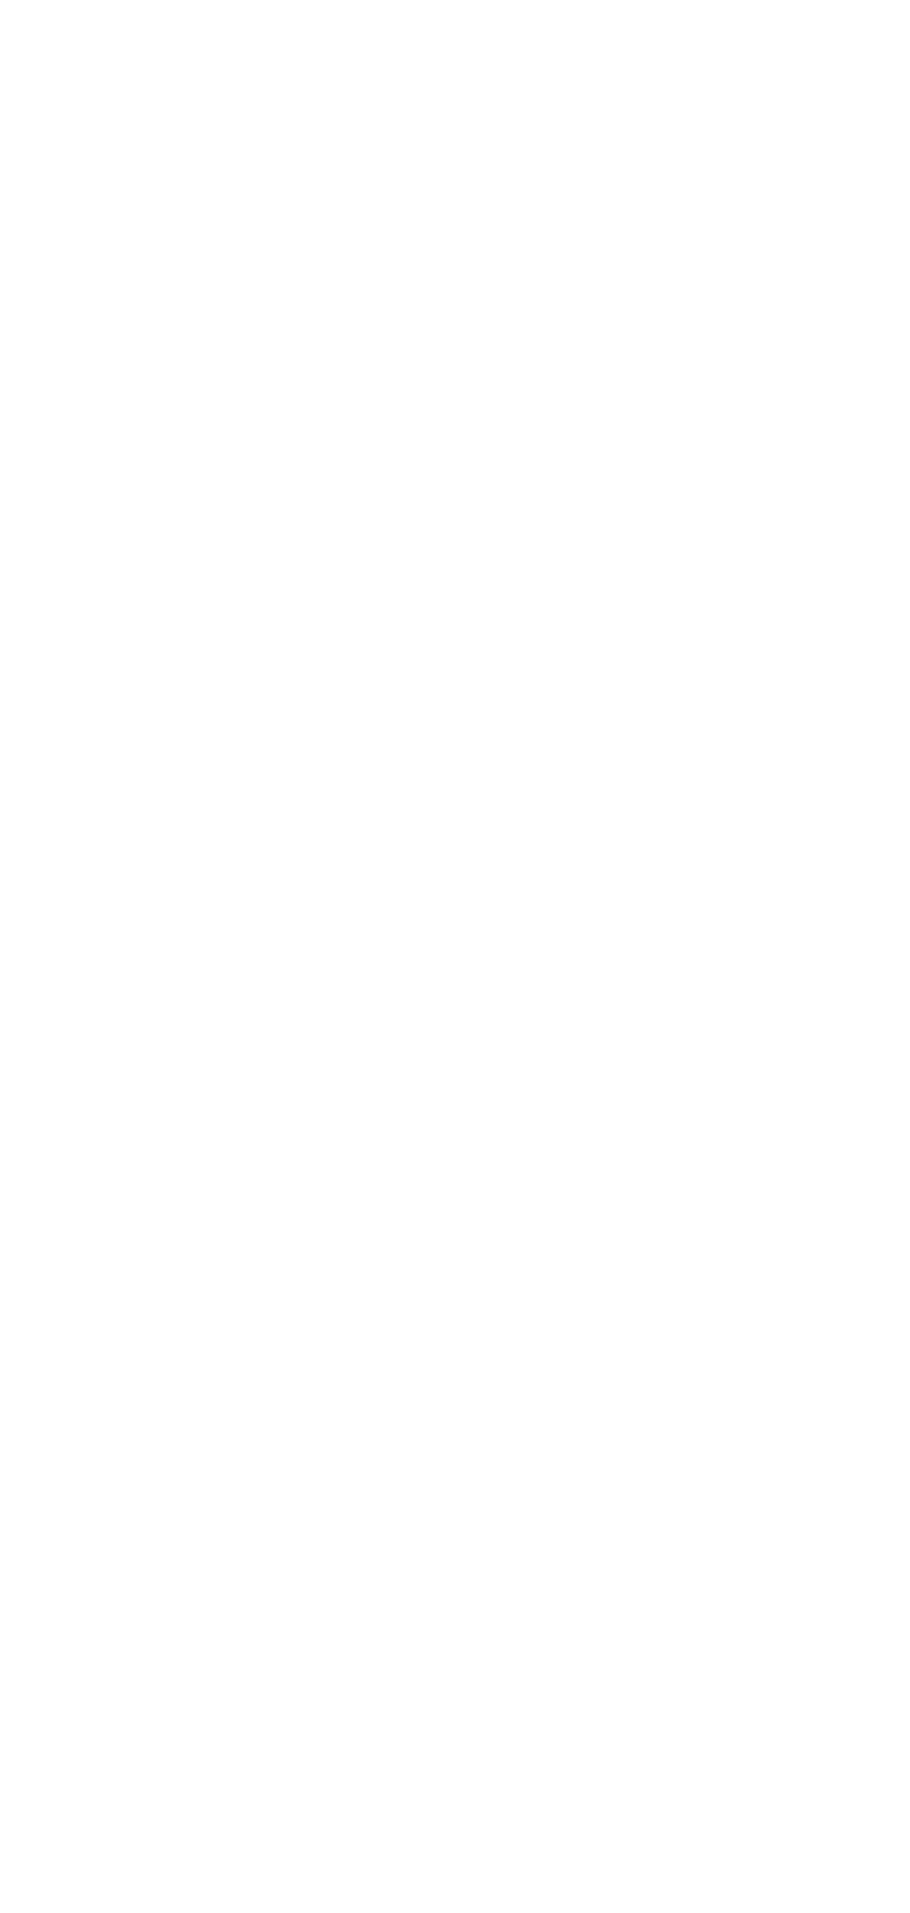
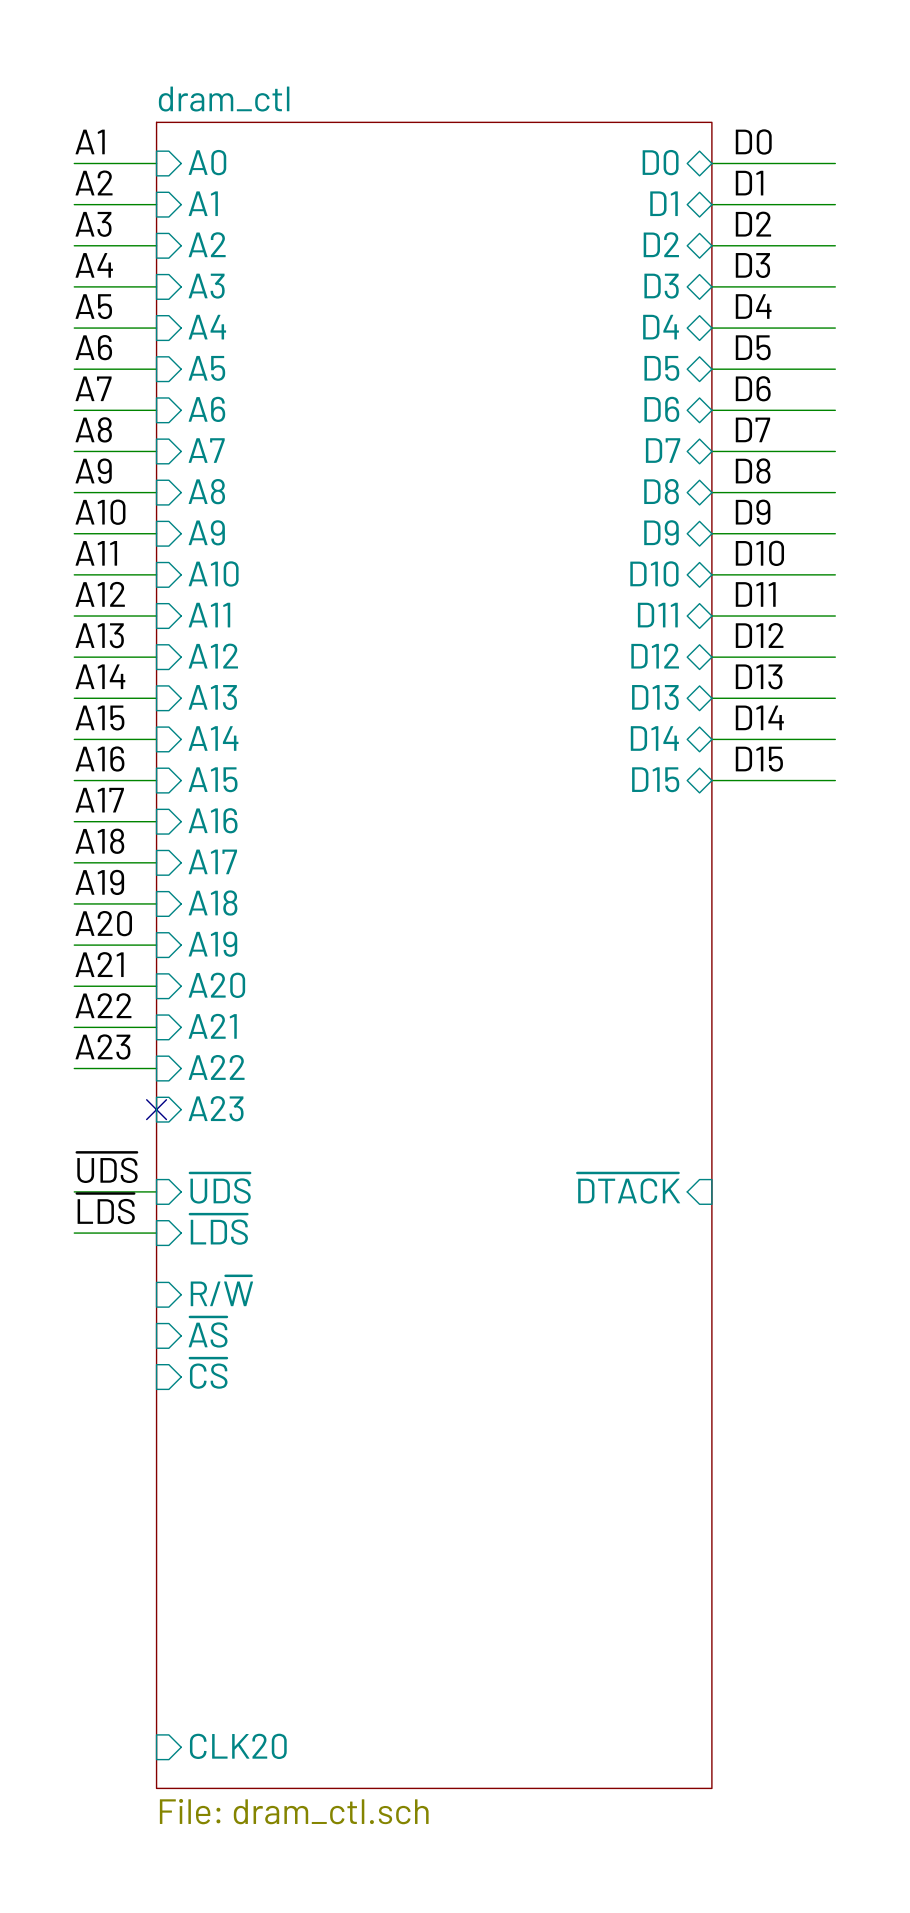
label: none -> A1 (90, 141)
label: none -> D0 (753, 141)
sheet pin: none -> A0 (207, 162)
sheet pin: none -> D0 (660, 162)
wire: none -> (74, 163) (156, 163)
wire: none -> (711, 163) (835, 163)
label: none -> A2 (93, 182)
label: none -> D1 (749, 183)
sheet pin: none -> A1 (203, 203)
sheet pin: none -> D1 (664, 203)
wire: none -> (74, 204) (156, 204)
wire: none -> (711, 204) (835, 204)
label: none -> A3 (93, 224)
label: none -> D2 (753, 224)
sheet pin: none -> A2 (207, 244)
sheet pin: none -> D2 (661, 244)
wire: none -> (74, 245) (156, 245)
wire: none -> (711, 245) (835, 245)
label: none -> A4 (94, 265)
label: none -> D3 (752, 265)
wire: none -> (74, 286) (156, 286)
sheet pin: none -> A3 (206, 286)
sheet pin: none -> D3 (661, 286)
wire: none -> (711, 286) (835, 286)
label: none -> A5 (93, 306)
label: none -> D4 (753, 306)
sheet pin: none -> A4 (207, 327)
sheet pin: none -> D4 (661, 327)
wire: none -> (74, 328) (156, 328)
wire: none -> (711, 328) (835, 328)
label: none -> A6 (93, 347)
label: none -> D5 (753, 347)
sheet pin: none -> A5 (206, 368)
sheet pin: none -> D5 (661, 368)
wire: none -> (74, 369) (156, 369)
wire: none -> (711, 369) (835, 369)
label: none -> A7 (93, 388)
label: none -> D6 (753, 388)
sheet pin: none -> A6 (206, 409)
sheet pin: none -> D6 (661, 409)
wire: none -> (74, 410) (156, 410)
wire: none -> (711, 410) (835, 410)
label: none -> A8 (93, 429)
label: none -> D7 (752, 429)
sheet pin: none -> A7 (206, 450)
sheet pin: none -> D7 (663, 450)
wire: none -> (74, 451) (156, 451)
wire: none -> (711, 451) (835, 451)
label: none -> A9 (93, 471)
label: none -> D8 (753, 471)
sheet pin: none -> A8 (206, 491)
sheet pin: none -> D8 (661, 491)
wire: none -> (74, 492) (156, 492)
wire: none -> (711, 492) (835, 492)
label: none -> A10 (100, 512)
label: none -> D9 (753, 512)
sheet pin: none -> A9 (206, 532)
sheet pin: none -> D9 (661, 532)
wire: none -> (74, 533) (156, 533)
wire: none -> (711, 533) (835, 533)
label: none -> A11 (96, 553)
label: none -> D10 (759, 553)
sheet pin: none -> A10 (213, 573)
sheet pin: none -> D10 (654, 573)
wire: none -> (74, 574) (156, 574)
wire: none -> (711, 574) (835, 574)
label: none -> A12 (100, 594)
label: none -> D11 (755, 594)
sheet pin: none -> A11 (209, 615)
sheet pin: none -> D11 (657, 615)
wire: none -> (74, 616) (156, 616)
wire: none -> (711, 616) (835, 616)
label: none -> A13 (99, 635)
label: none -> D12 (759, 635)
sheet pin: none -> A12 (213, 656)
sheet pin: none -> D12 (655, 656)
wire: none -> (74, 657) (156, 657)
wire: none -> (711, 657) (835, 657)
label: none -> A14 (100, 676)
label: none -> D13 (759, 676)
sheet pin: none -> A13 (212, 697)
sheet pin: none -> D13 (655, 697)
wire: none -> (74, 698) (156, 698)
wire: none -> (711, 698) (835, 698)
label: none -> D14 (759, 717)
label: none -> A15 (99, 718)
sheet pin: none -> A14 (213, 738)
sheet pin: none -> D14 (654, 738)
wire: none -> (74, 739) (156, 739)
wire: none -> (711, 739) (835, 739)
label: none -> A16 (99, 759)
label: none -> D15 (759, 759)
sheet pin: none -> A15 (213, 779)
sheet pin: none -> D15 (655, 779)
wire: none -> (74, 780) (156, 780)
wire: none -> (711, 780) (835, 780)
label: none -> A17 (99, 800)
sheet pin: none -> A16 (213, 820)
wire: none -> (74, 821) (156, 821)
label: none -> A18 (99, 841)
sheet pin: none -> A17 (212, 861)
wire: none -> (74, 862) (156, 862)
label: none -> A19 (99, 882)
wire: none -> (74, 903) (156, 903)
sheet pin: none -> A18 (212, 903)
label: none -> A20 (103, 923)
sheet pin: none -> A19 (212, 944)
wire: none -> (74, 945) (156, 945)
sheet dram_ctl: none -> File: dram_ctl.sch (434, 955)
label: none -> A21 (99, 964)
sheet pin: none -> A20 (216, 985)
wire: none -> (74, 986) (156, 986)
label: none -> A22 (103, 1005)
sheet pin: none -> A21 (212, 1026)
wire: none -> (74, 1027) (156, 1027)
label: none -> A23 (102, 1046)
sheet pin: none -> A22 (216, 1067)
wire: none -> (74, 1068) (156, 1068)
sheet pin: none -> A23 (216, 1108)
no-connect mark: none -> (156, 1109)
label: none -> ~{UDS} (107, 1167)
sheet pin: none -> ~{UDS} (220, 1188)
sheet pin: none -> ~{DTACK} (628, 1188)
wire: none -> (74, 1191) (156, 1191)
label: none -> ~{LDS} (105, 1208)
sheet pin: none -> ~{LDS} (218, 1229)
wire: none -> (74, 1233) (156, 1233)
sheet pin: none -> R/~{W} (221, 1291)
sheet pin: none -> ~{AS} (208, 1332)
sheet pin: none -> ~{CS} (208, 1373)
sheet pin: none -> CLK20 (238, 1746)

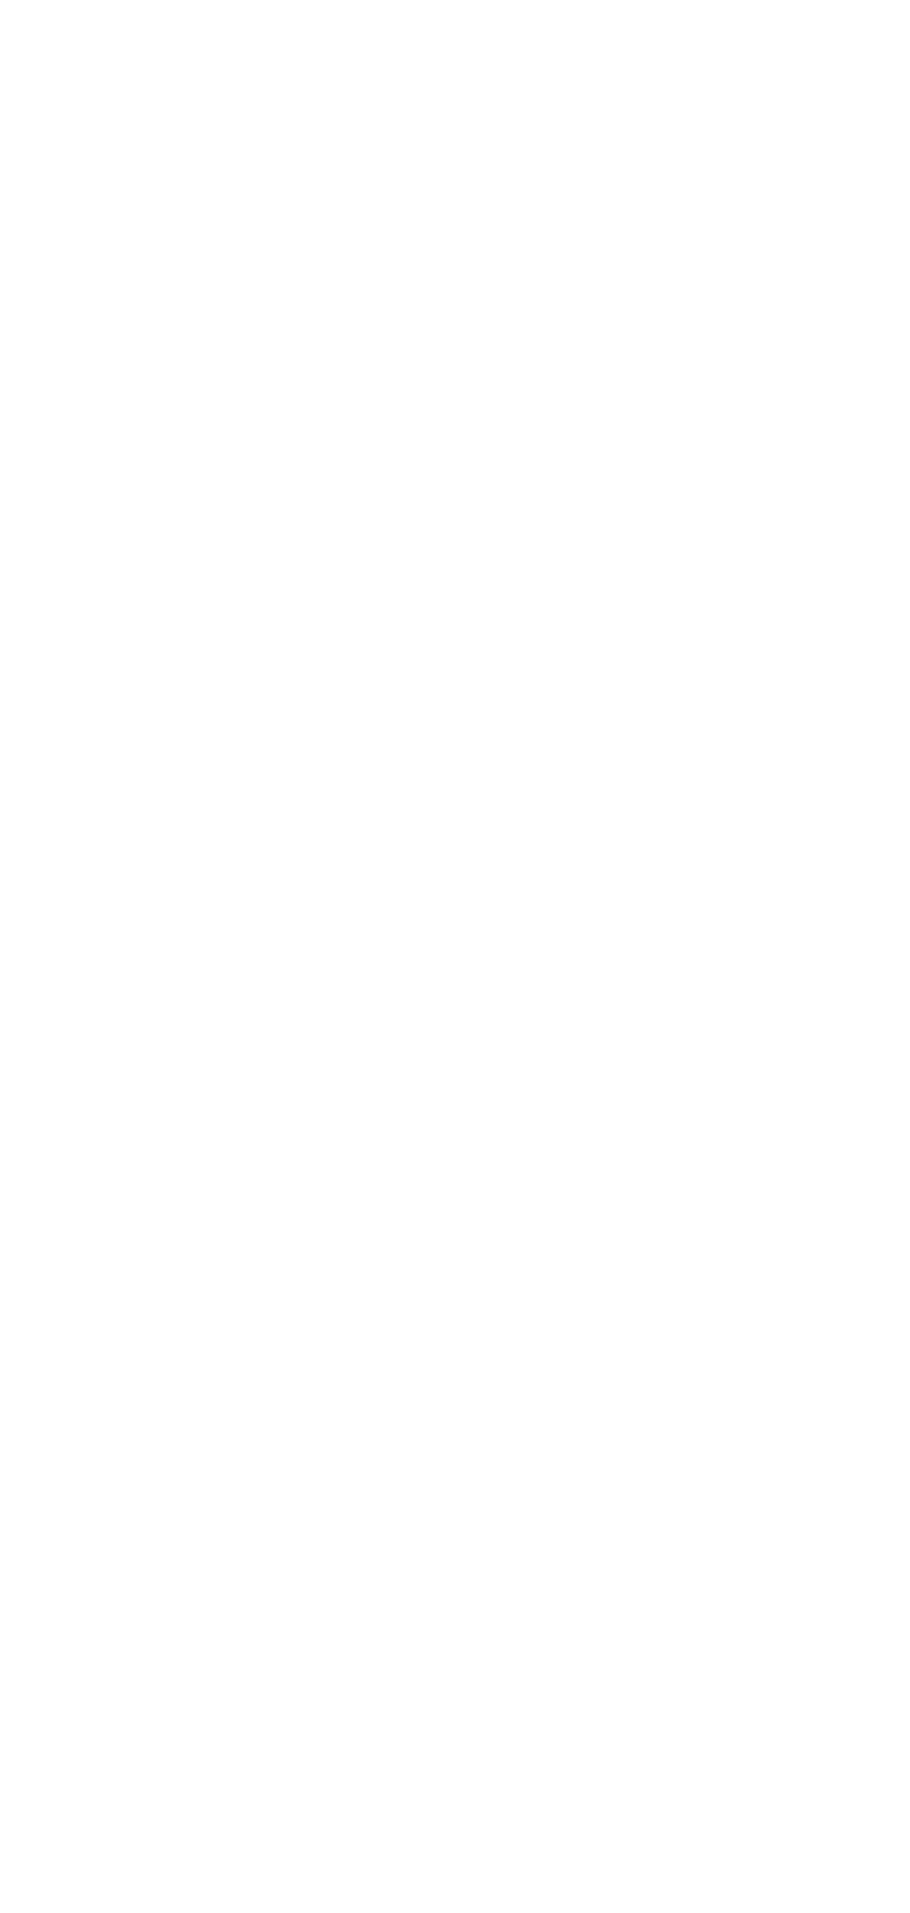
label: A1 (90, 141) -> none
label: D0 (753, 141) -> none
sheet pin: A0 (207, 162) -> none
sheet pin: D0 (660, 162) -> none
wire: (74, 163) (156, 163) -> none
wire: (711, 163) (835, 163) -> none
label: A2 (93, 182) -> none
label: D1 (749, 183) -> none
sheet pin: A1 (203, 203) -> none
sheet pin: D1 (664, 203) -> none
wire: (74, 204) (156, 204) -> none
wire: (711, 204) (835, 204) -> none
label: A3 (93, 224) -> none
label: D2 (753, 224) -> none
sheet pin: A2 (207, 244) -> none
sheet pin: D2 (661, 244) -> none
wire: (74, 245) (156, 245) -> none
wire: (711, 245) (835, 245) -> none
label: A4 (94, 265) -> none
label: D3 (752, 265) -> none
wire: (74, 286) (156, 286) -> none
sheet pin: A3 (206, 286) -> none
sheet pin: D3 (661, 286) -> none
wire: (711, 286) (835, 286) -> none
label: A5 (93, 306) -> none
label: D4 (753, 306) -> none
sheet pin: A4 (207, 327) -> none
sheet pin: D4 (661, 327) -> none
wire: (74, 328) (156, 328) -> none
wire: (711, 328) (835, 328) -> none
label: A6 (93, 347) -> none
label: D5 (753, 347) -> none
sheet pin: A5 (206, 368) -> none
sheet pin: D5 (661, 368) -> none
wire: (74, 369) (156, 369) -> none
wire: (711, 369) (835, 369) -> none
label: A7 (93, 388) -> none
label: D6 (753, 388) -> none
sheet pin: A6 (206, 409) -> none
sheet pin: D6 (661, 409) -> none
wire: (74, 410) (156, 410) -> none
wire: (711, 410) (835, 410) -> none
label: A8 (93, 429) -> none
label: D7 (752, 429) -> none
sheet pin: A7 (206, 450) -> none
sheet pin: D7 (663, 450) -> none
wire: (74, 451) (156, 451) -> none
wire: (711, 451) (835, 451) -> none
label: A9 (93, 471) -> none
label: D8 (753, 471) -> none
sheet pin: A8 (206, 491) -> none
sheet pin: D8 (661, 491) -> none
wire: (74, 492) (156, 492) -> none
wire: (711, 492) (835, 492) -> none
label: A10 (100, 512) -> none
label: D9 (753, 512) -> none
sheet pin: A9 (206, 532) -> none
sheet pin: D9 (661, 532) -> none
wire: (74, 533) (156, 533) -> none
wire: (711, 533) (835, 533) -> none
label: A11 (96, 553) -> none
label: D10 (759, 553) -> none
sheet pin: A10 (213, 573) -> none
sheet pin: D10 (654, 573) -> none
wire: (74, 574) (156, 574) -> none
wire: (711, 574) (835, 574) -> none
label: A12 (100, 594) -> none
label: D11 (755, 594) -> none
sheet pin: A11 (209, 615) -> none
sheet pin: D11 (657, 615) -> none
wire: (74, 616) (156, 616) -> none
wire: (711, 616) (835, 616) -> none
label: A13 (99, 635) -> none
label: D12 (759, 635) -> none
sheet pin: A12 (213, 656) -> none
sheet pin: D12 (655, 656) -> none
wire: (74, 657) (156, 657) -> none
wire: (711, 657) (835, 657) -> none
label: A14 (100, 676) -> none
label: D13 (759, 676) -> none
sheet pin: A13 (212, 697) -> none
sheet pin: D13 (655, 697) -> none
wire: (74, 698) (156, 698) -> none
wire: (711, 698) (835, 698) -> none
label: D14 (759, 717) -> none
label: A15 (99, 718) -> none
sheet pin: A14 (213, 738) -> none
sheet pin: D14 (654, 738) -> none
wire: (74, 739) (156, 739) -> none
wire: (711, 739) (835, 739) -> none
label: A16 (99, 759) -> none
label: D15 (759, 759) -> none
sheet pin: A15 (213, 779) -> none
sheet pin: D15 (655, 779) -> none
wire: (74, 780) (156, 780) -> none
wire: (711, 780) (835, 780) -> none
label: A17 (99, 800) -> none
sheet pin: A16 (213, 820) -> none
wire: (74, 821) (156, 821) -> none
label: A18 (99, 841) -> none
sheet pin: A17 (212, 861) -> none
wire: (74, 862) (156, 862) -> none
label: A19 (99, 882) -> none
wire: (74, 903) (156, 903) -> none
sheet pin: A18 (212, 903) -> none
label: A20 (103, 923) -> none
sheet pin: A19 (212, 944) -> none
wire: (74, 945) (156, 945) -> none
sheet dram_ctl: File: dram_ctl.sch (434, 955) -> none
label: A21 (99, 964) -> none
sheet pin: A20 (216, 985) -> none
wire: (74, 986) (156, 986) -> none
label: A22 (103, 1005) -> none
sheet pin: A21 (212, 1026) -> none
wire: (74, 1027) (156, 1027) -> none
label: A23 (102, 1046) -> none
sheet pin: A22 (216, 1067) -> none
wire: (74, 1068) (156, 1068) -> none
sheet pin: A23 (216, 1108) -> none
no-connect mark: (156, 1109) -> none
label: ~{UDS} (107, 1167) -> none
sheet pin: ~{UDS} (220, 1188) -> none
sheet pin: ~{DTACK} (628, 1188) -> none
wire: (74, 1191) (156, 1191) -> none
label: ~{LDS} (105, 1208) -> none
sheet pin: ~{LDS} (218, 1229) -> none
wire: (74, 1233) (156, 1233) -> none
sheet pin: R/~{W} (221, 1291) -> none
sheet pin: ~{AS} (208, 1332) -> none
sheet pin: ~{CS} (208, 1373) -> none
sheet pin: CLK20 (238, 1746) -> none

